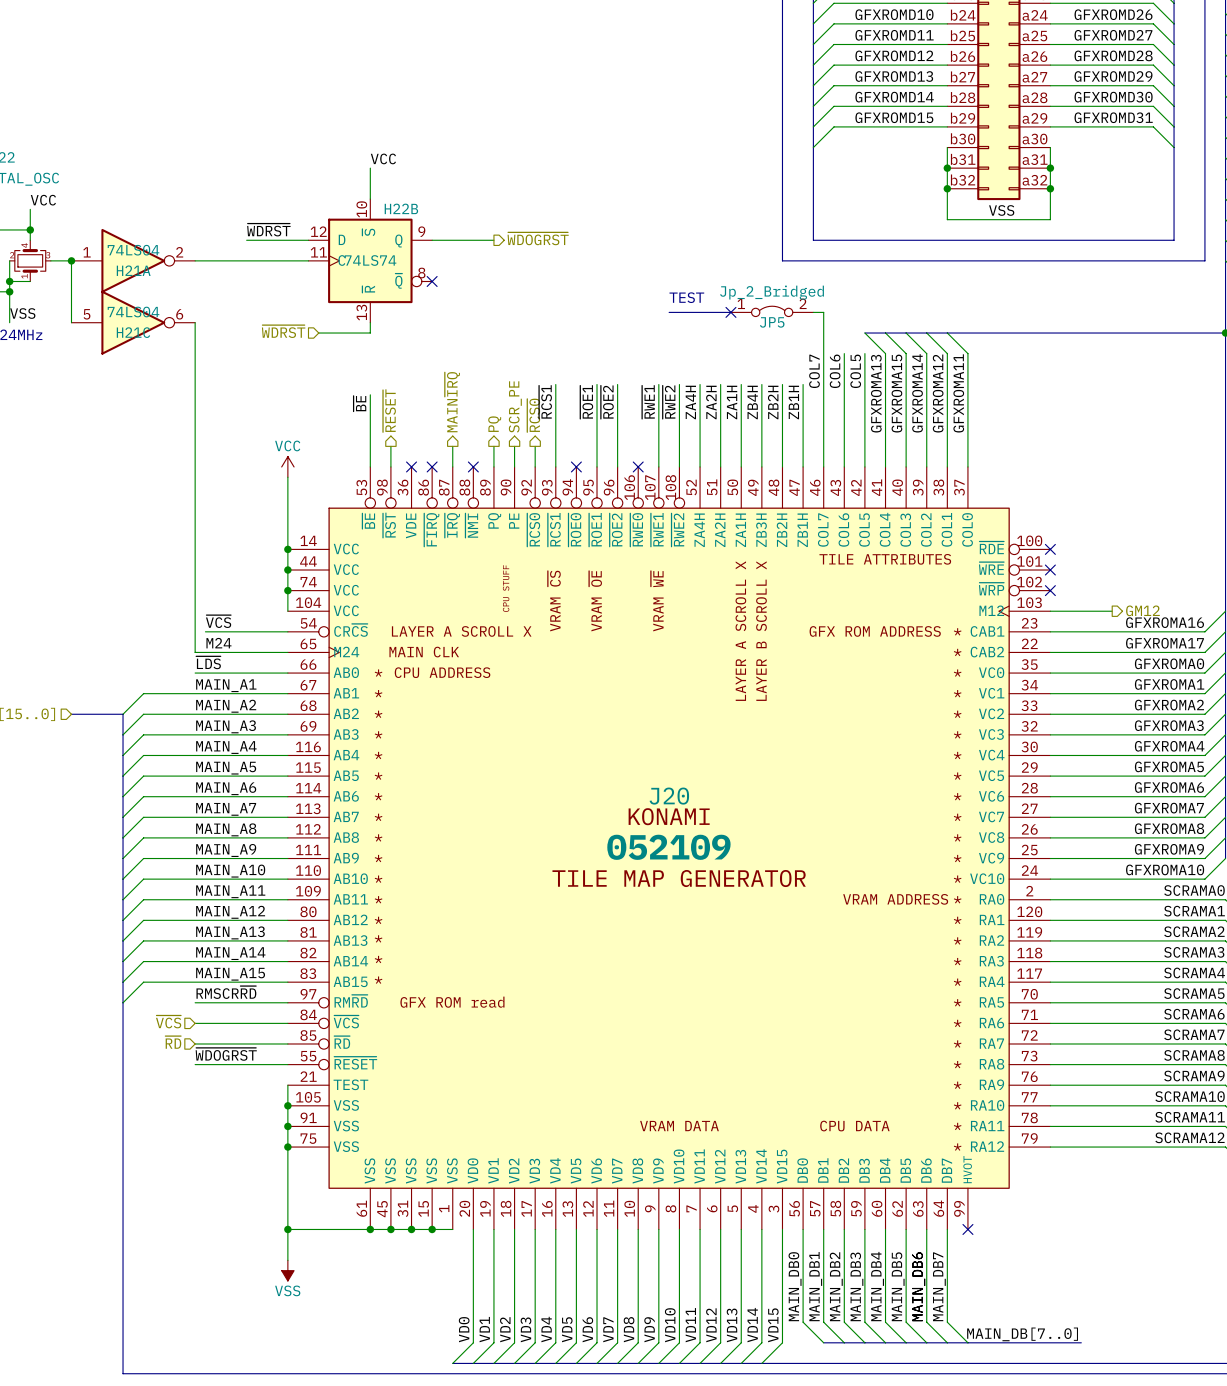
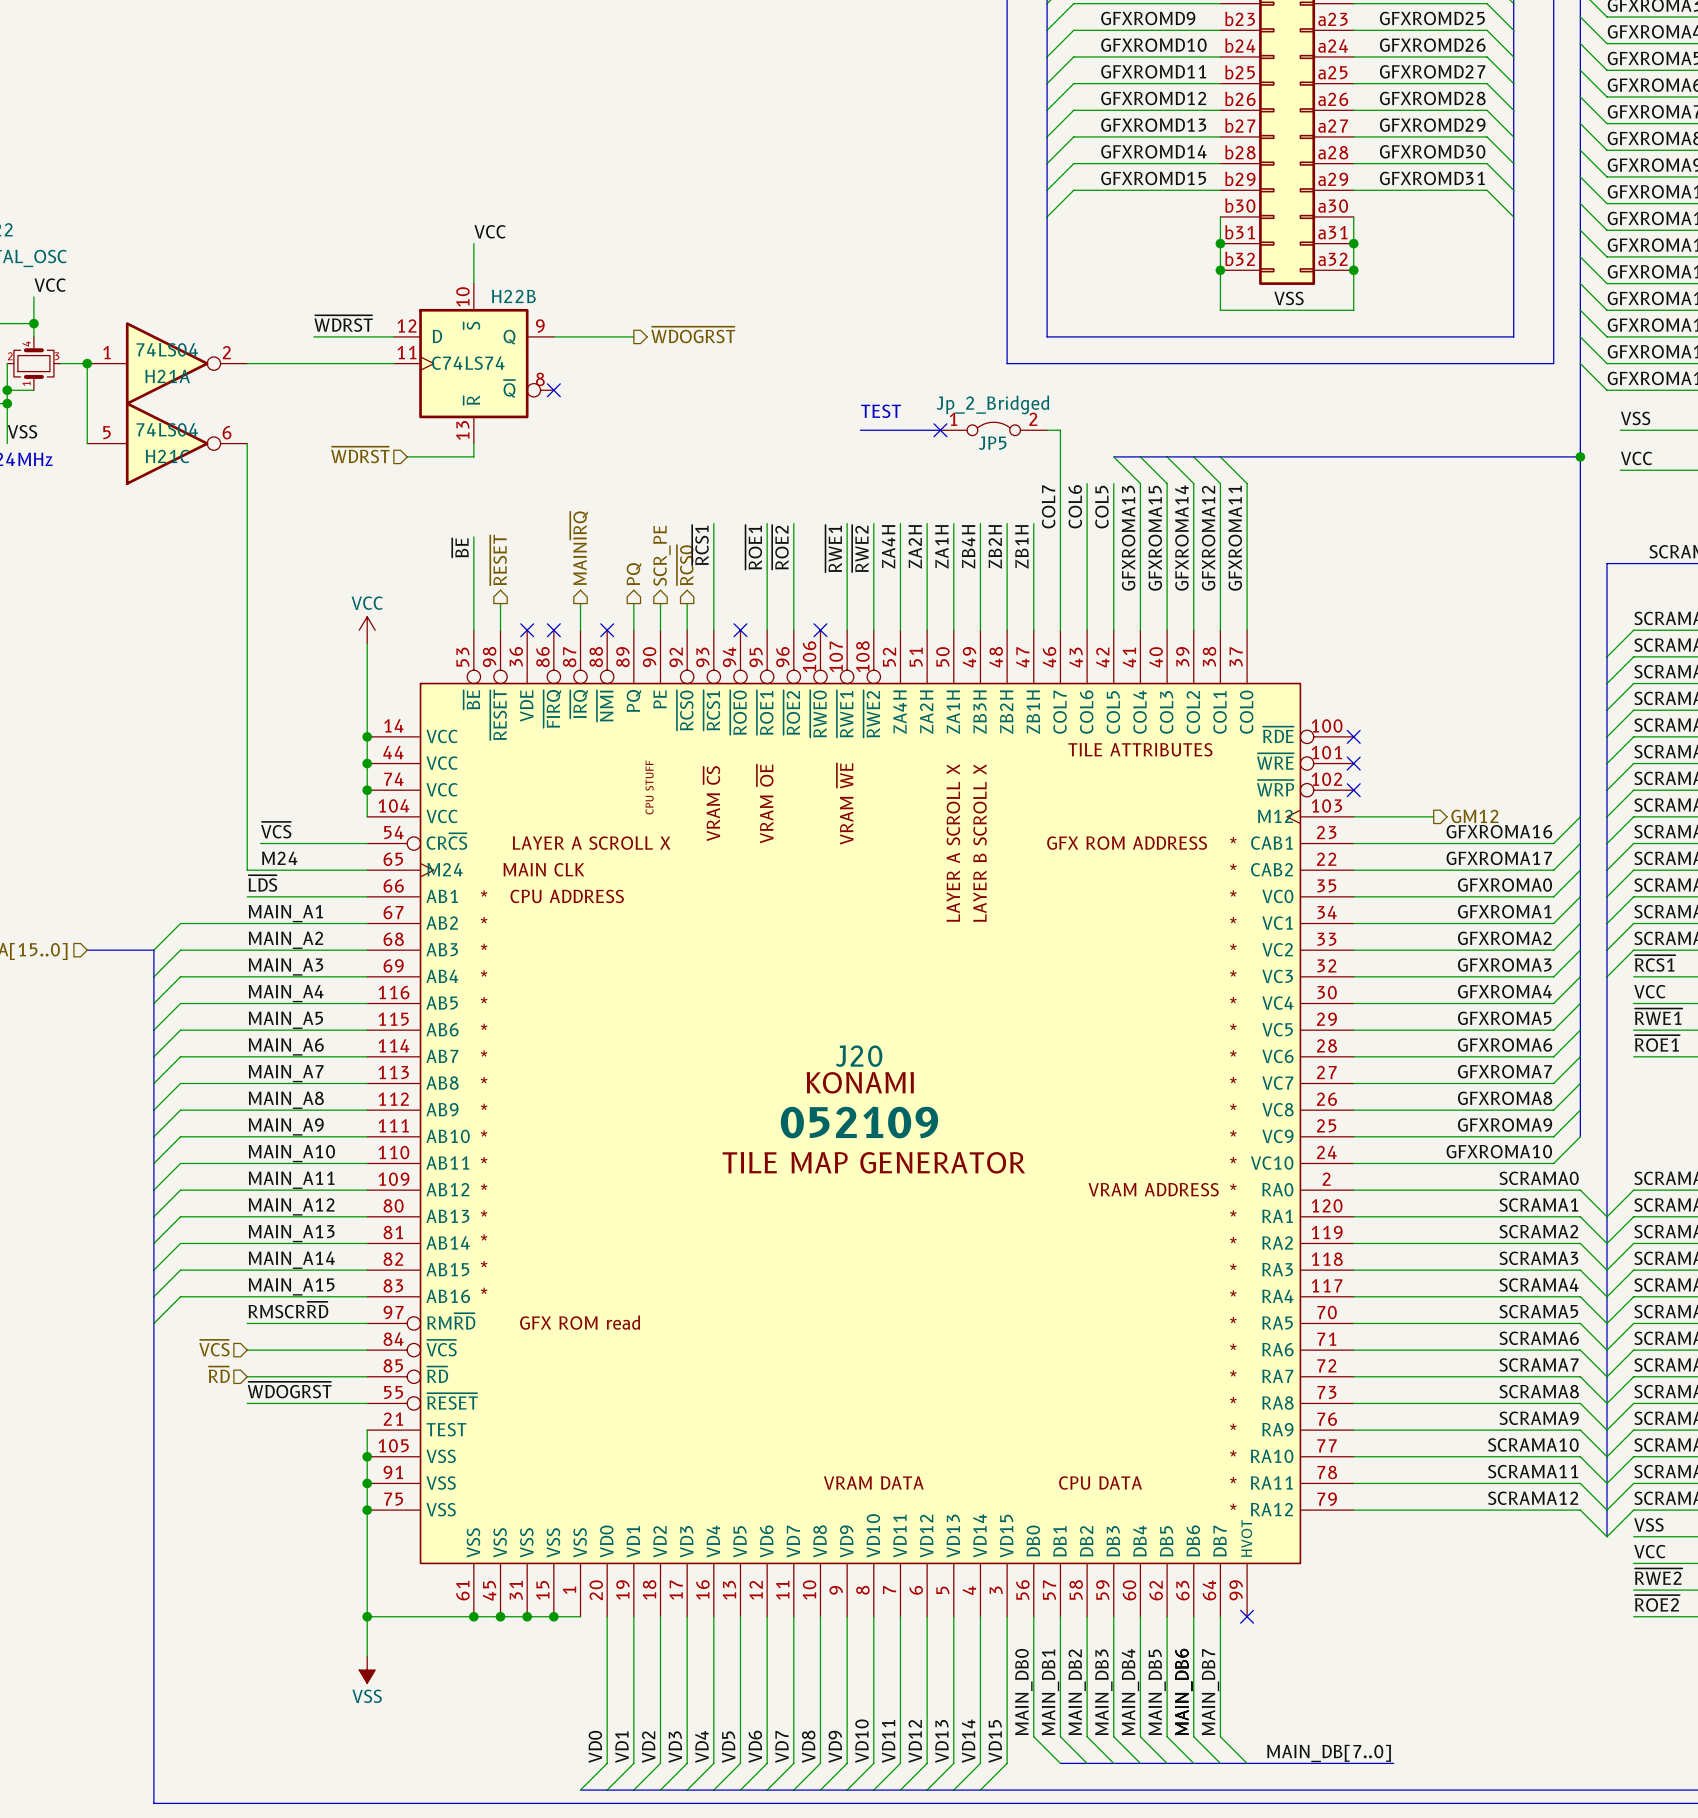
J20 symbol: [287, 466, 1051, 1230] -> [367, 630, 1354, 1617]

